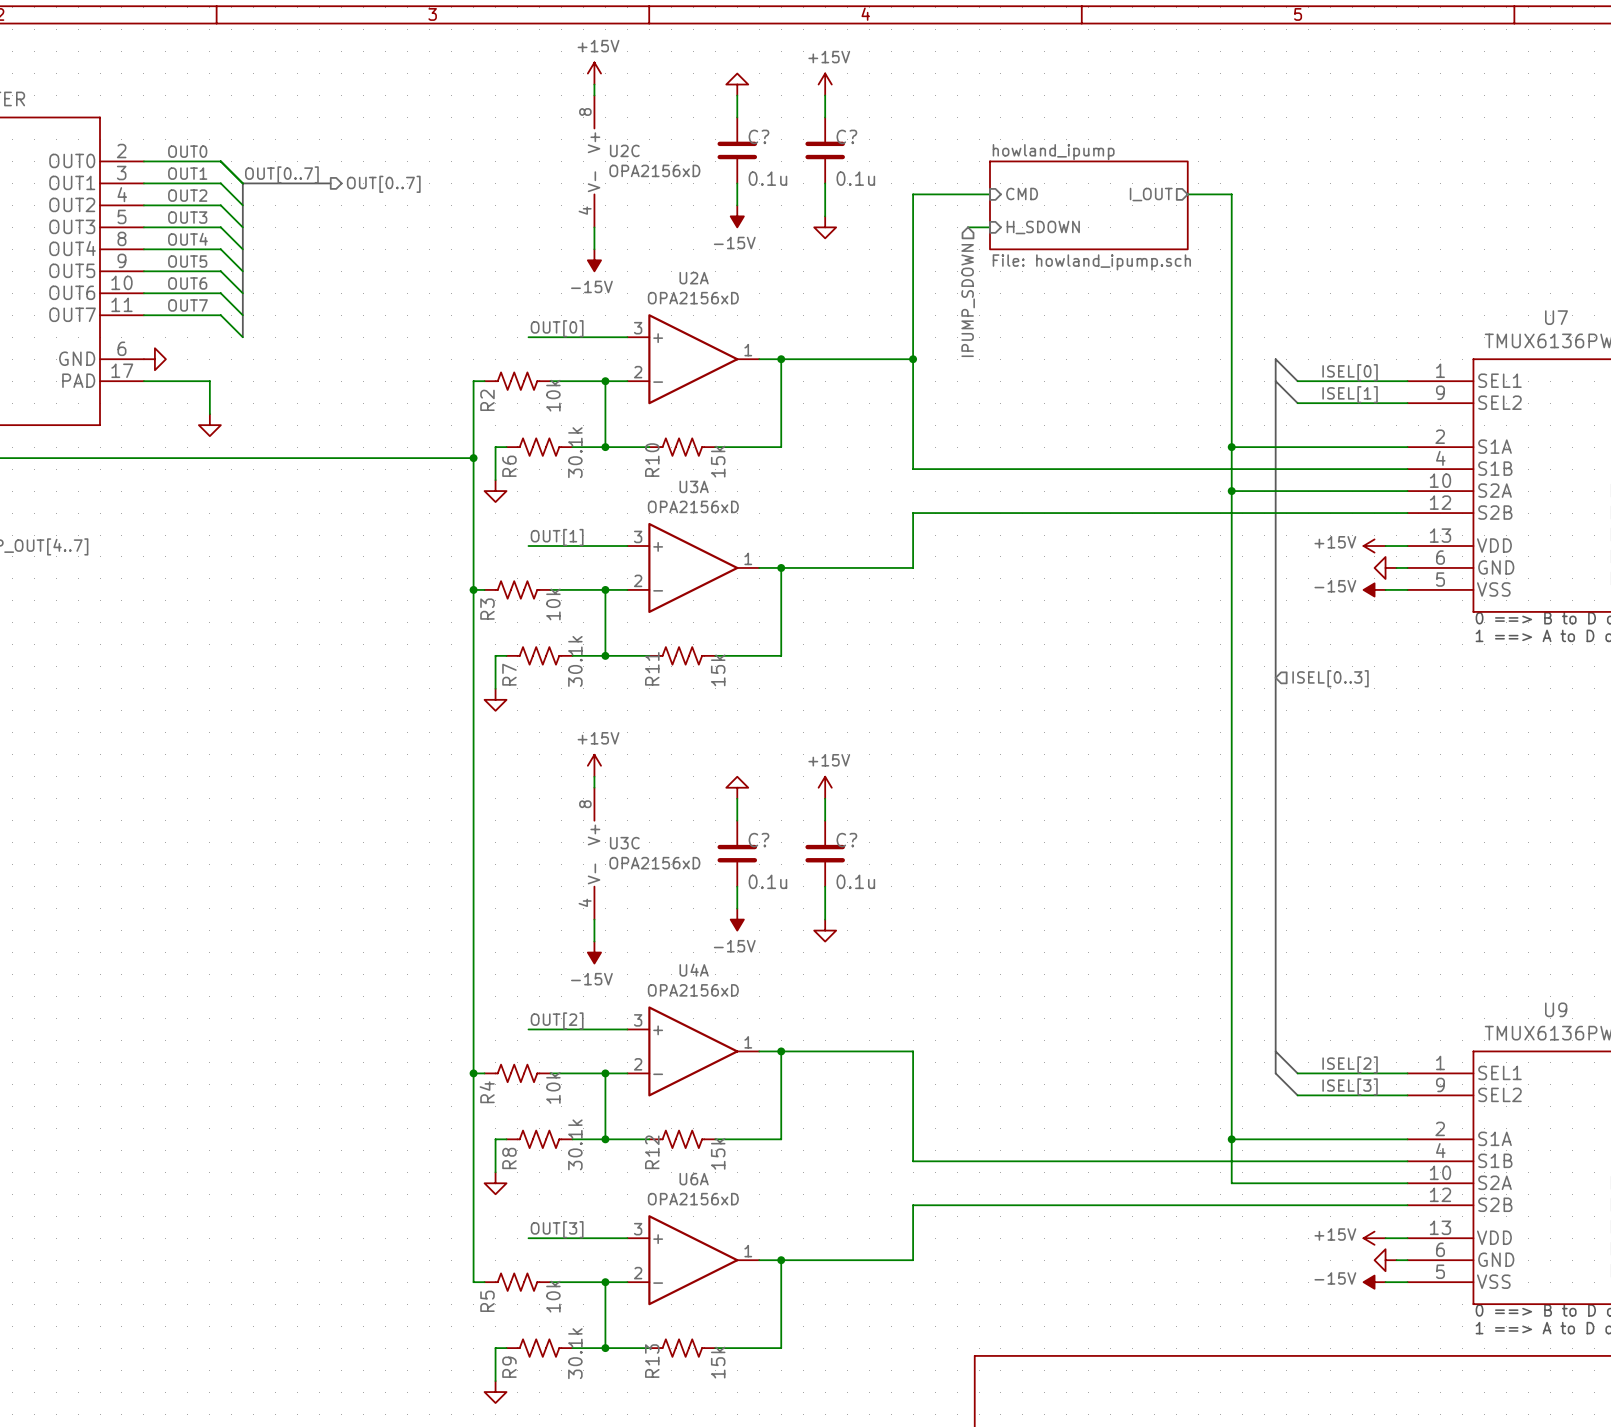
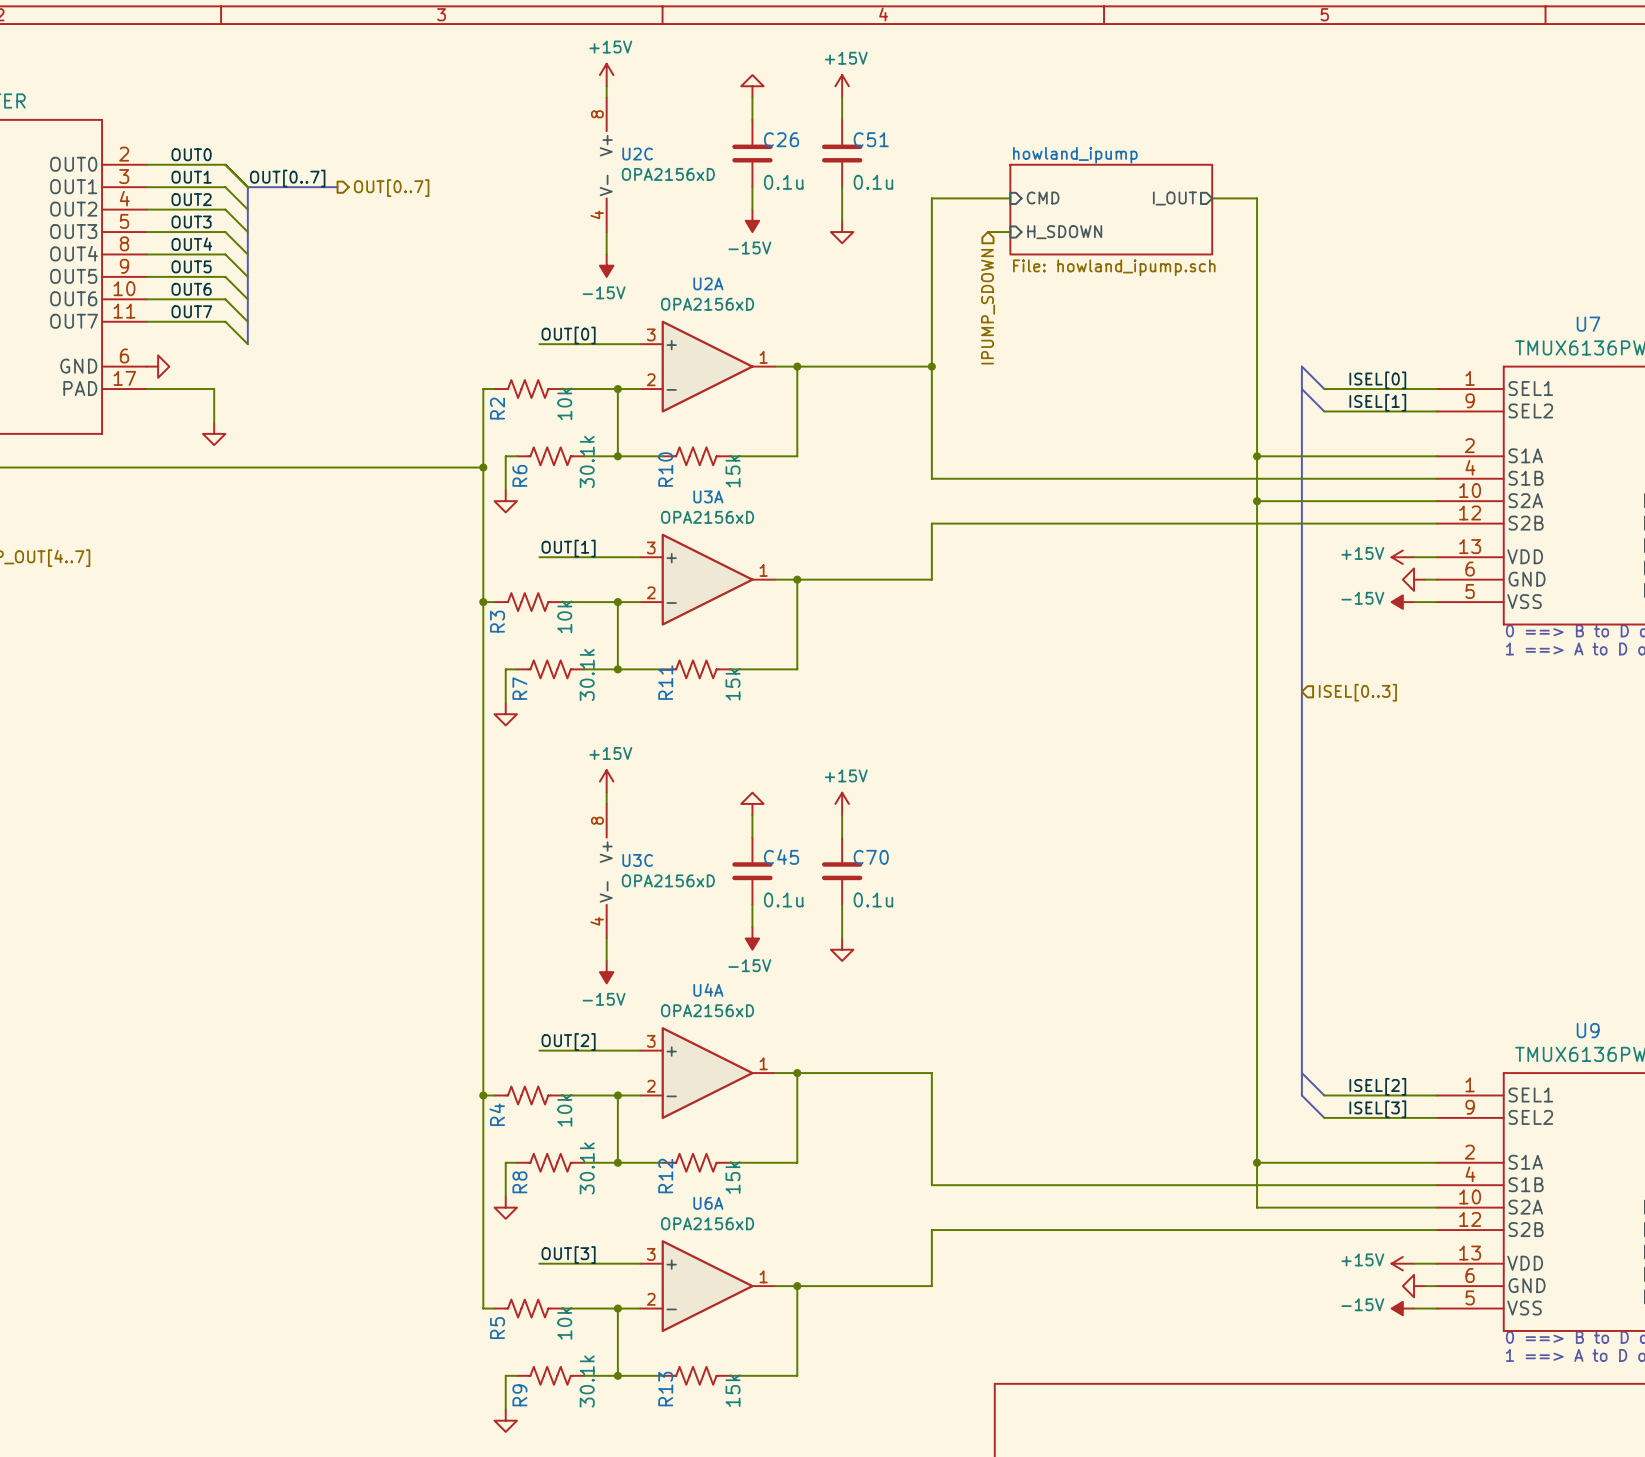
C? name: C? (758, 136) -> C26 (781, 139)
C? name: C? (846, 136) -> C51 (871, 139)
C? name: C? (758, 840) -> C45 (781, 857)
C? name: C? (846, 840) -> C70 (871, 857)

